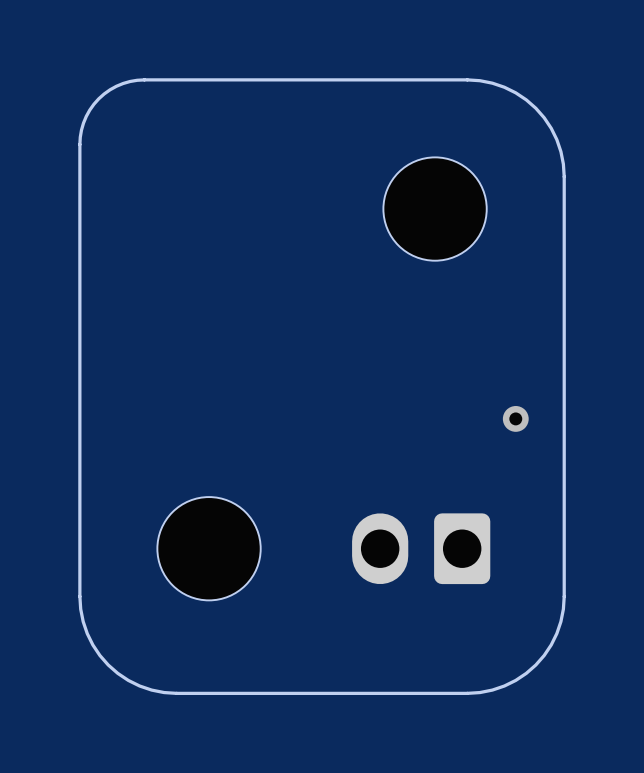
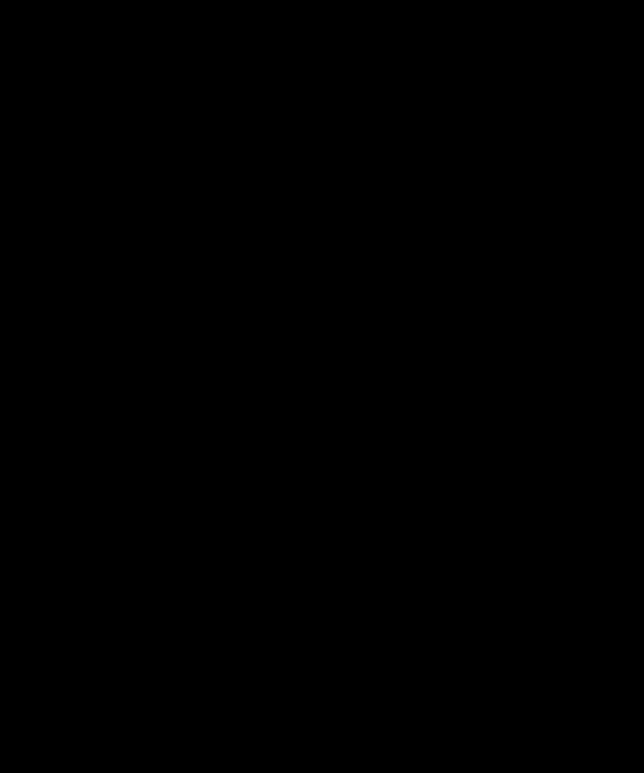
board edge: (467, 79) (137, 80) (123, 83) (110, 89) (98, 98) (89, 110) (81, 130) (79, 144) (80, 609) (87, 633) (99, 655) (108, 665) (128, 680) (151, 690) (176, 693) (479, 692) (492, 690) (515, 680) (535, 665) (551, 644) (560, 621) (564, 596) (563, 164) (556, 139) (544, 117) (535, 108) (515, 92) (504, 87) (492, 83) (467, 79) -> none
part: (435, 209) -> none
via: (515, 418) -> none
part: (209, 548) -> none
part: (421, 548) -> none

